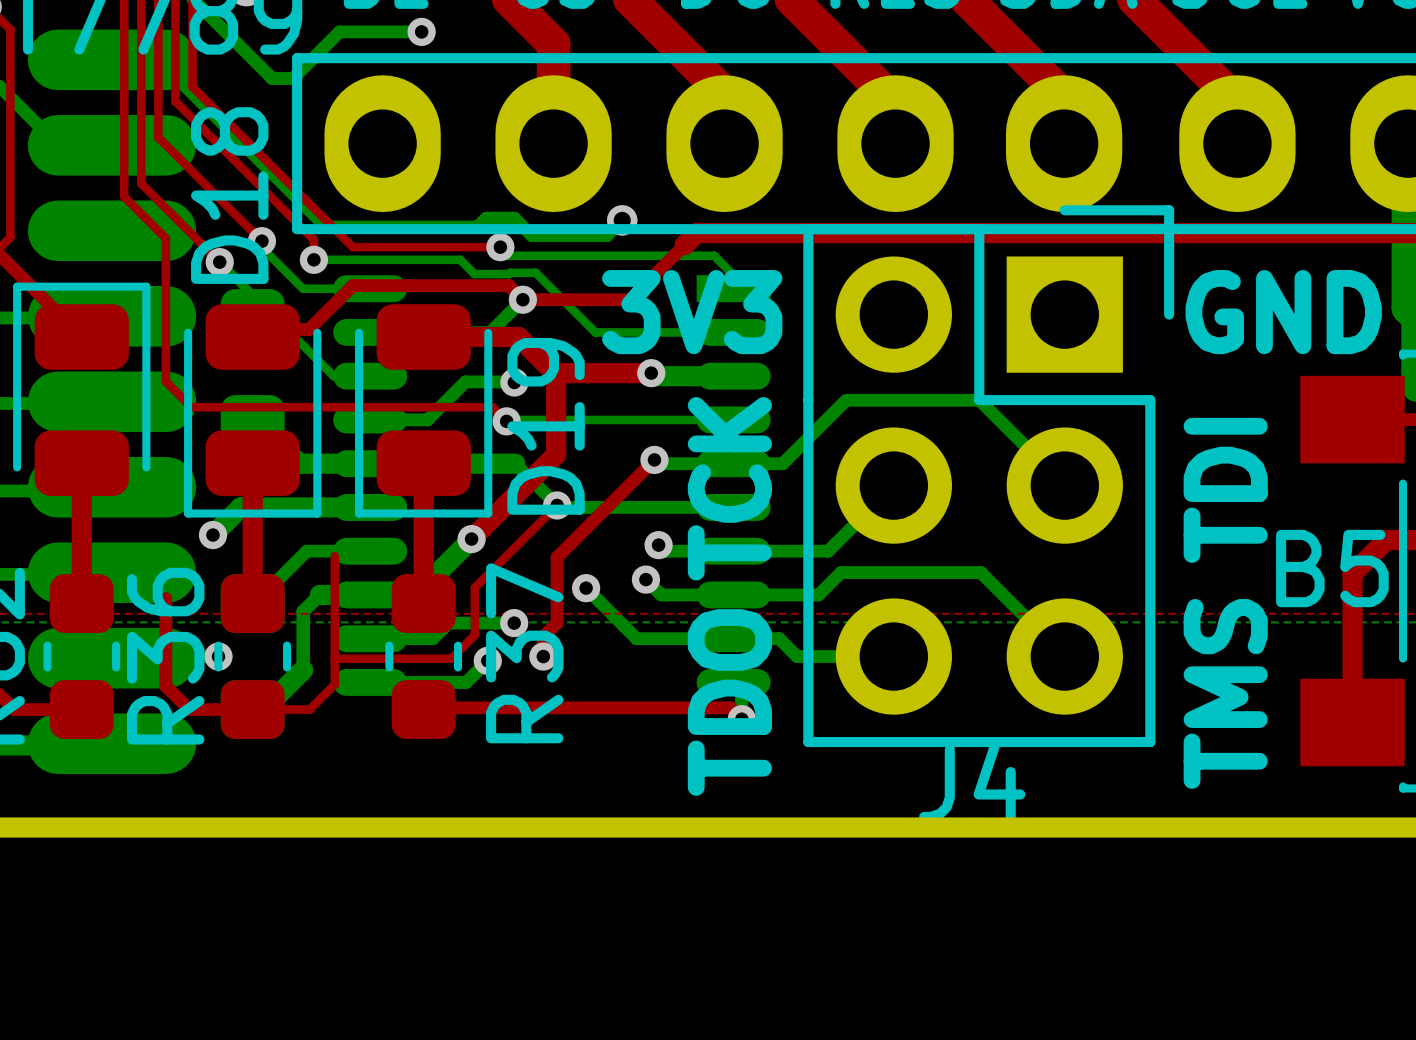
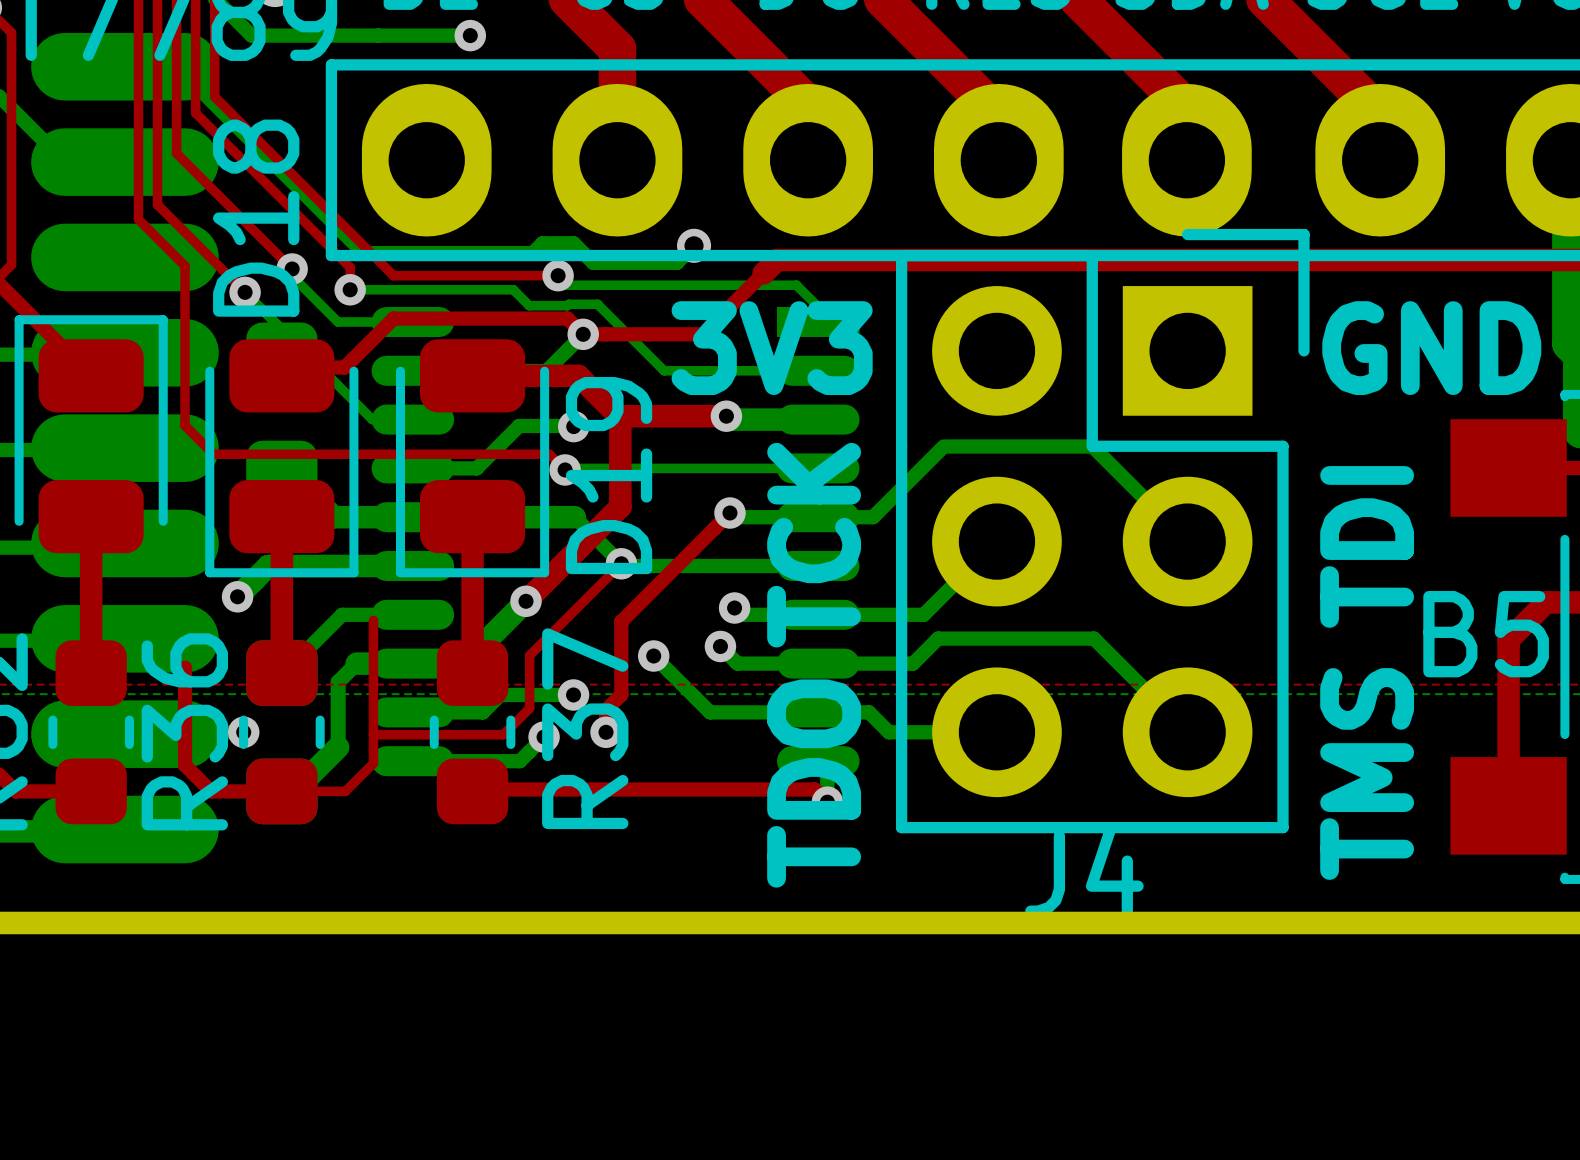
bottom track: (225, 31) (272, 78) (292, 78) (339, 31) -> (251, 35) (378, 35)

